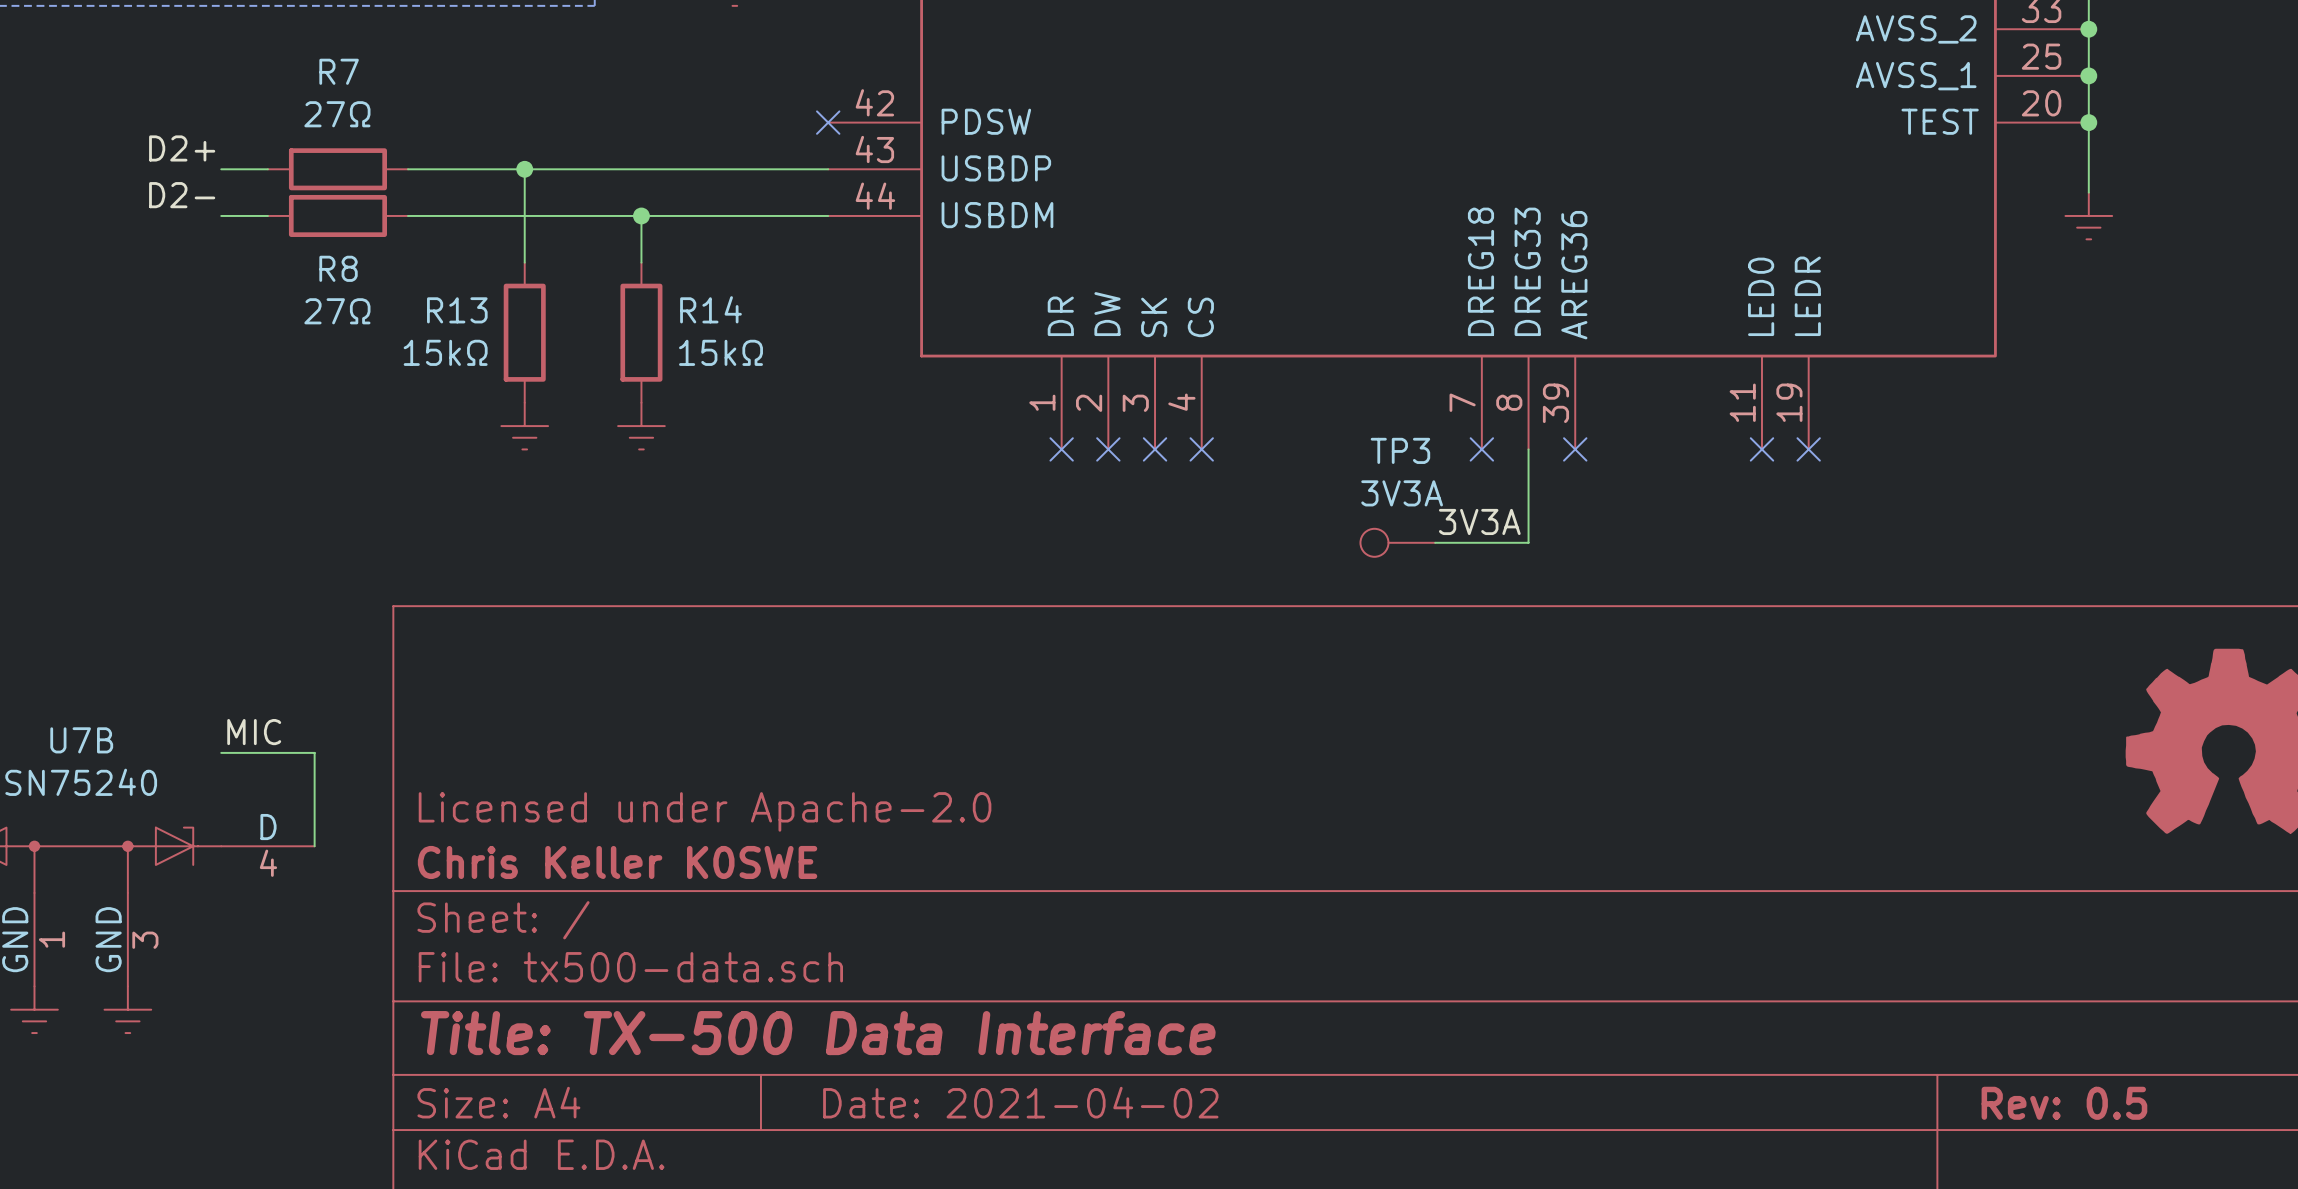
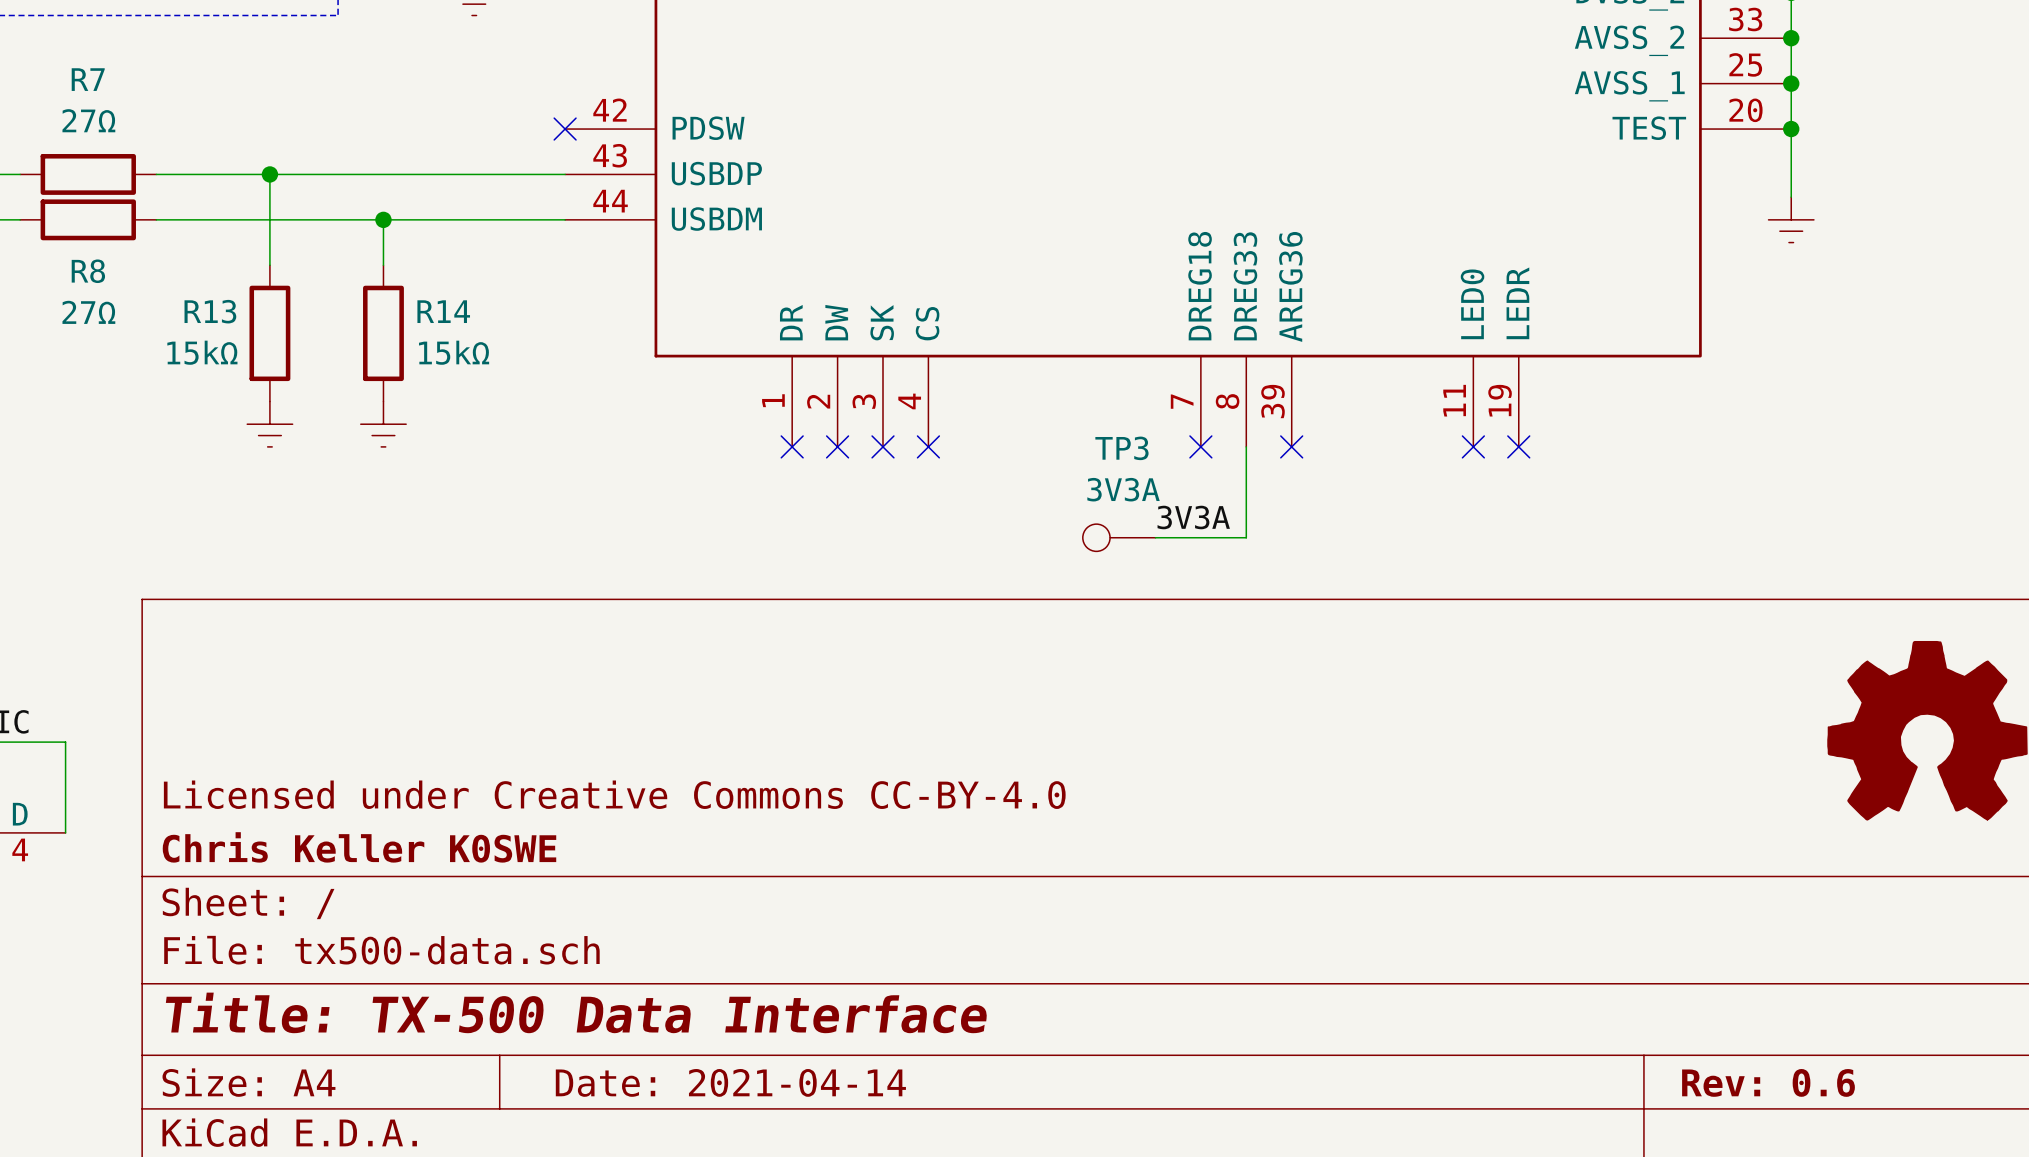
title block: Licensed under Apache-2.0 (705, 811) -> Licensed under Creative Commons CC-BY-4.0 (614, 794)
title block: Date: 2021-04-02 (1020, 1102) -> Date: 2021-04-14 (730, 1082)
title block: Rev: 0.5 (2064, 1103) -> Rev: 0.6 (1768, 1082)

